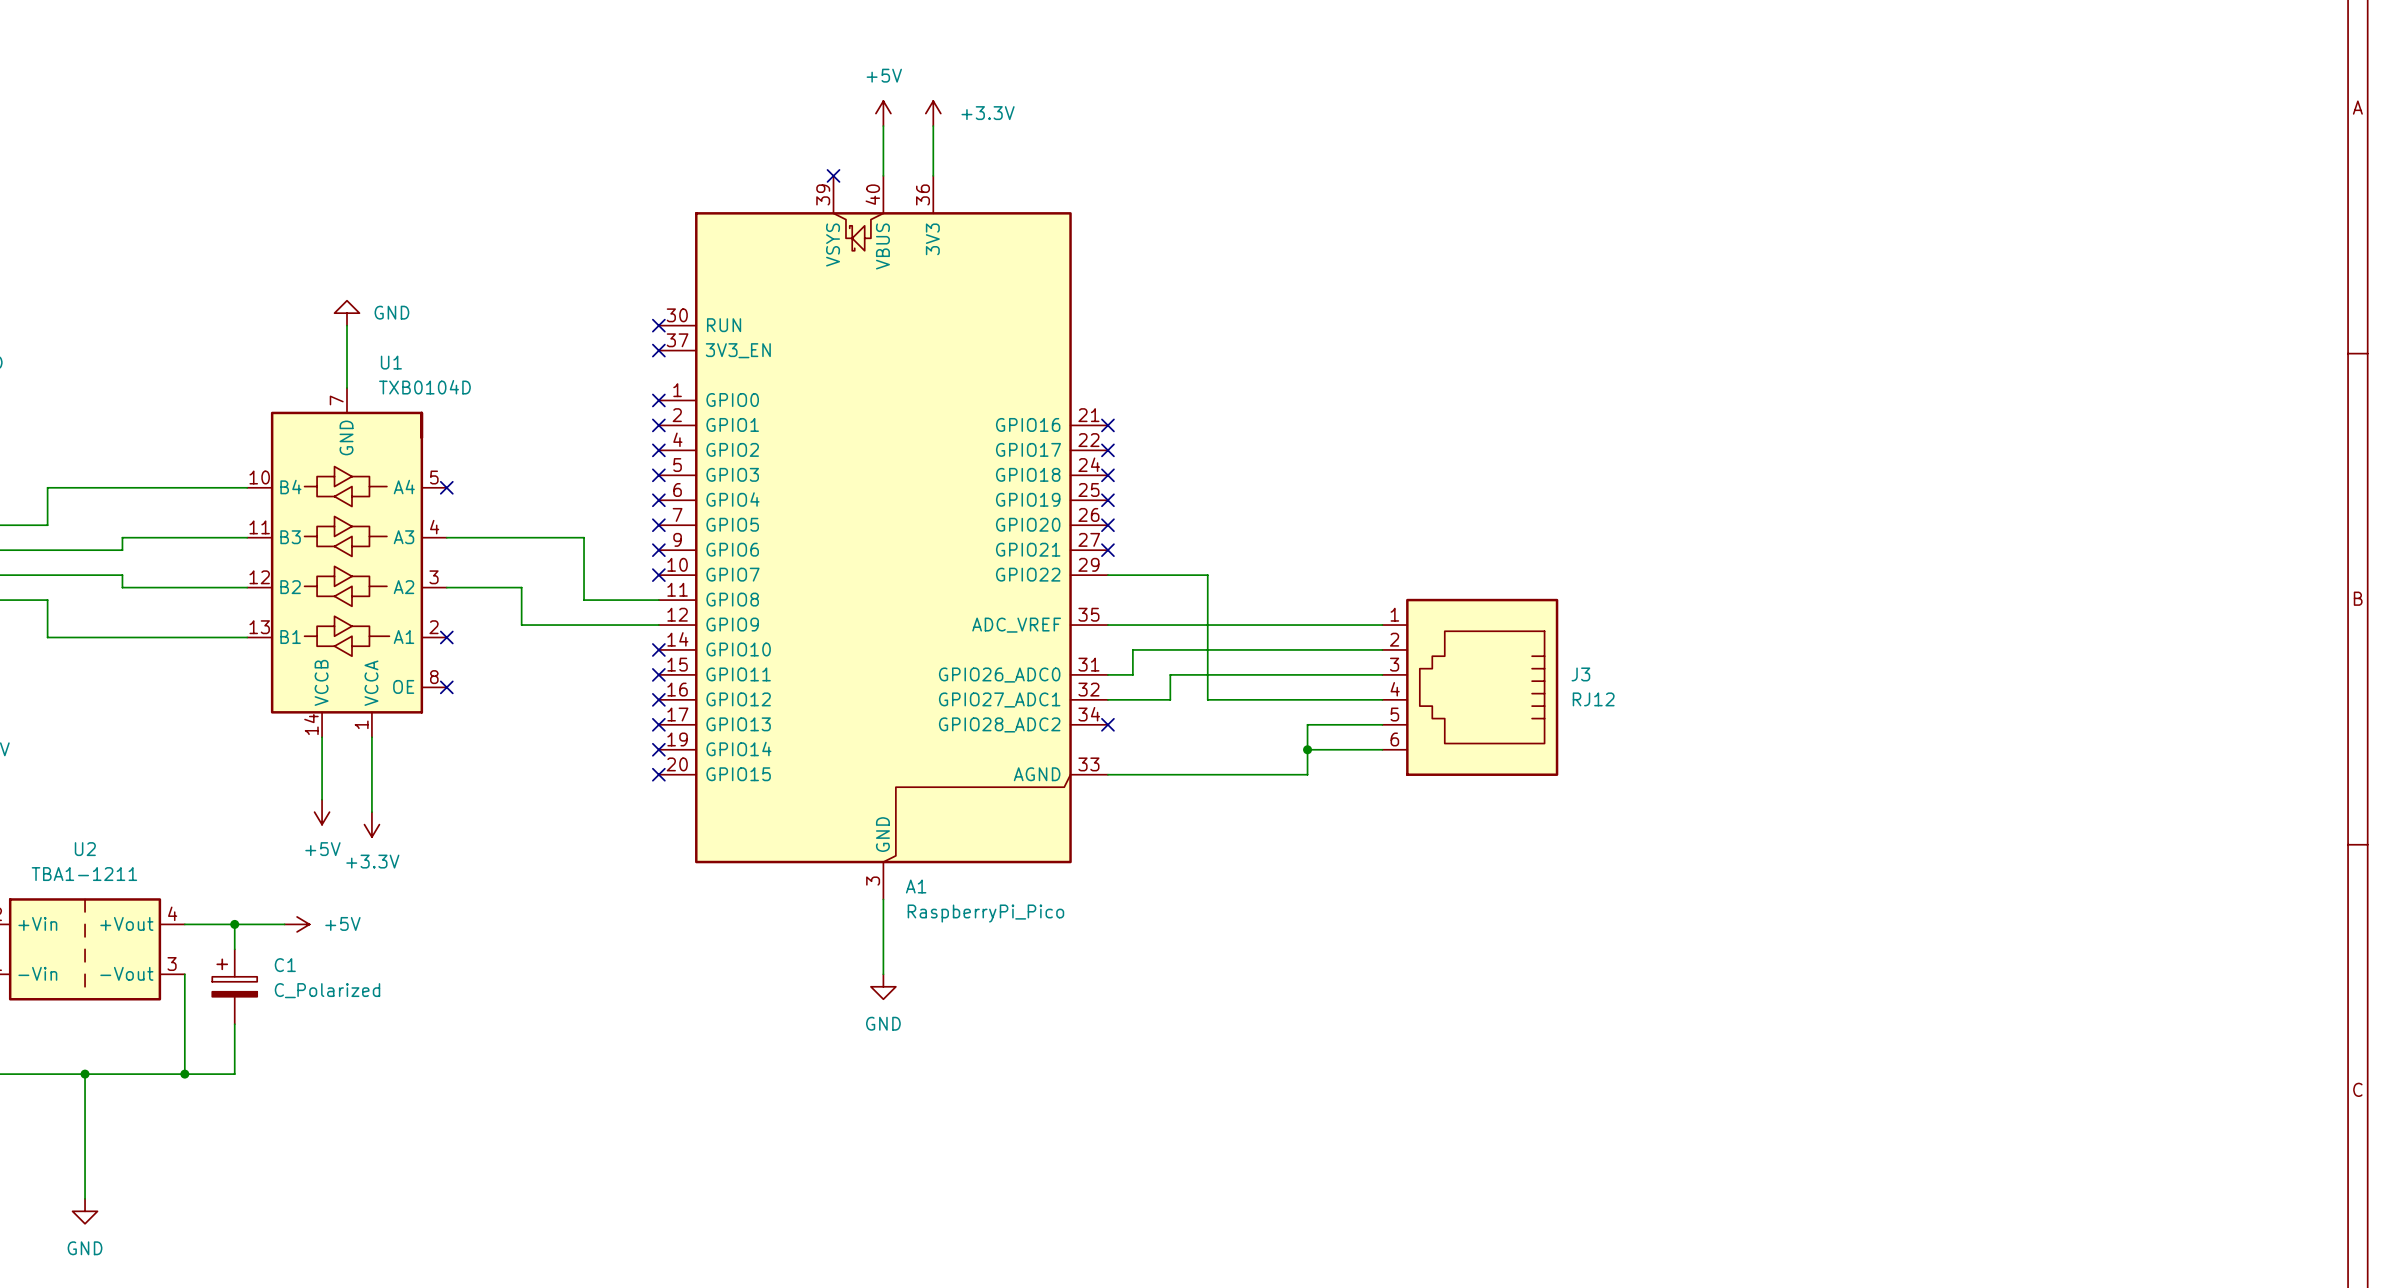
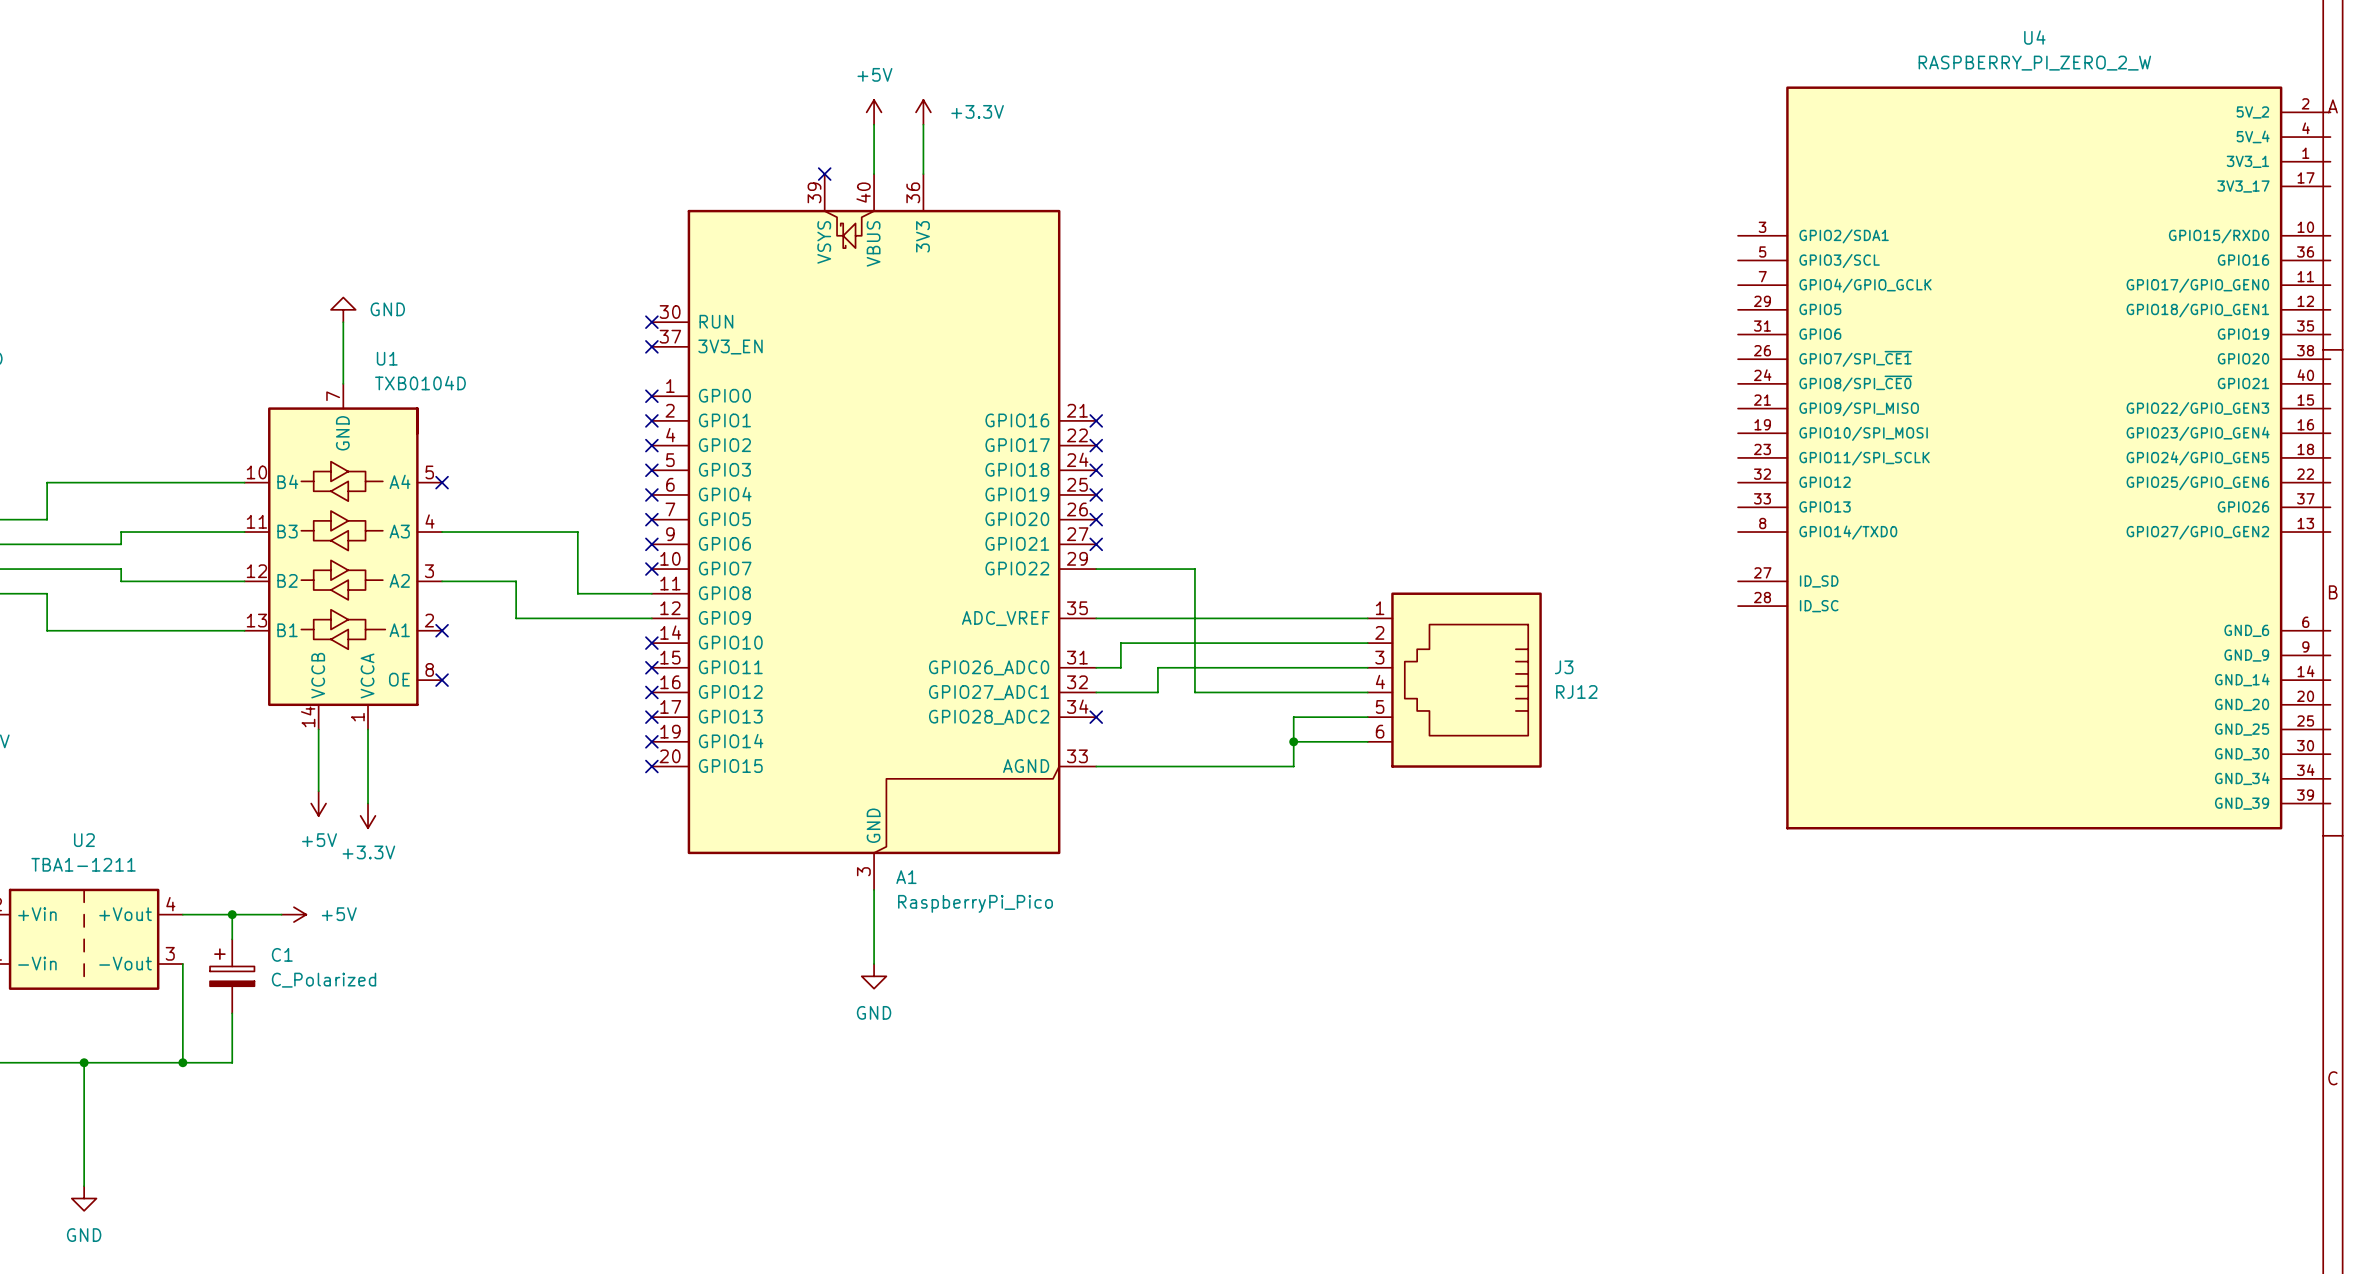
U4: none -> RASPBERRY_PI_ZERO_2_W (2034, 457)

